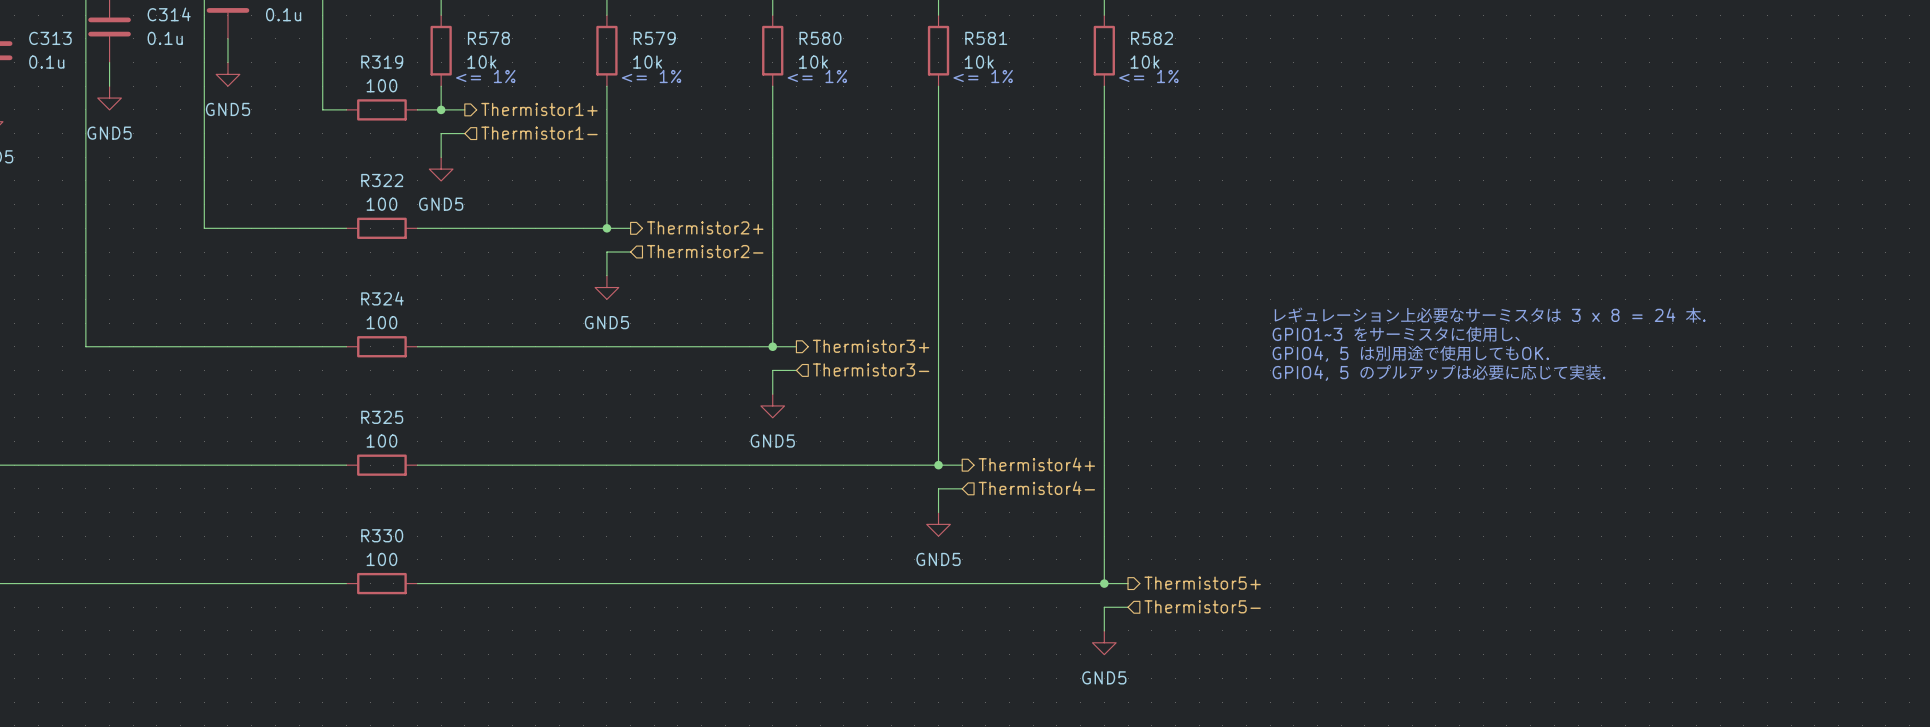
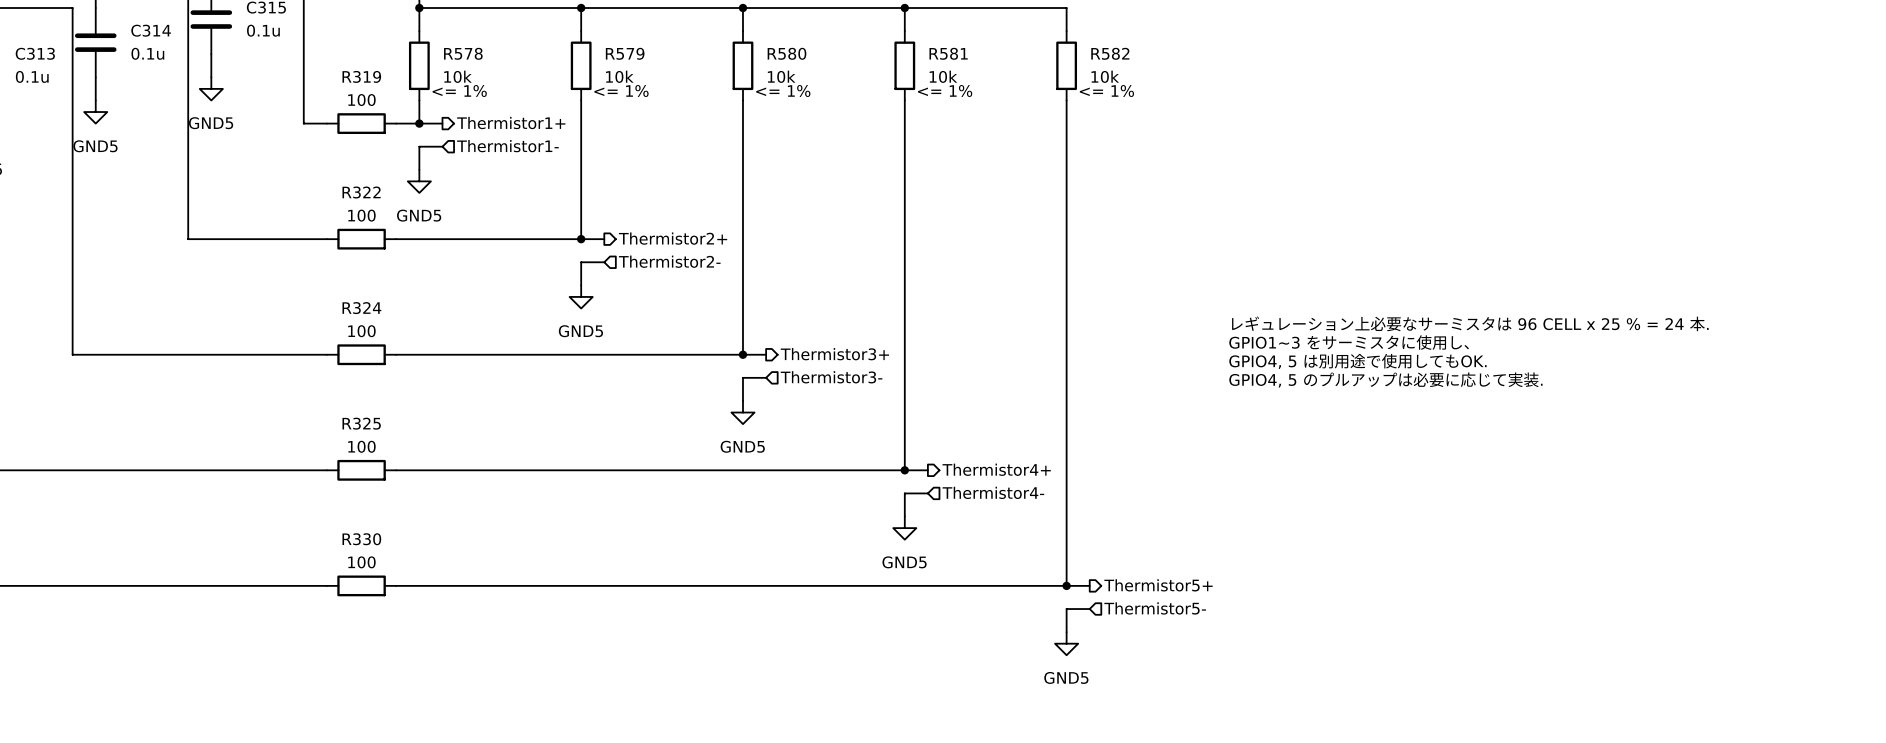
text: レギュレーション上必要なサーミスタは 3 x 8 = 24 本. (1489, 315) -> レギュレーション上必要なサーミスタは 96 CELL x 25 % = 24 本. (1470, 323)

